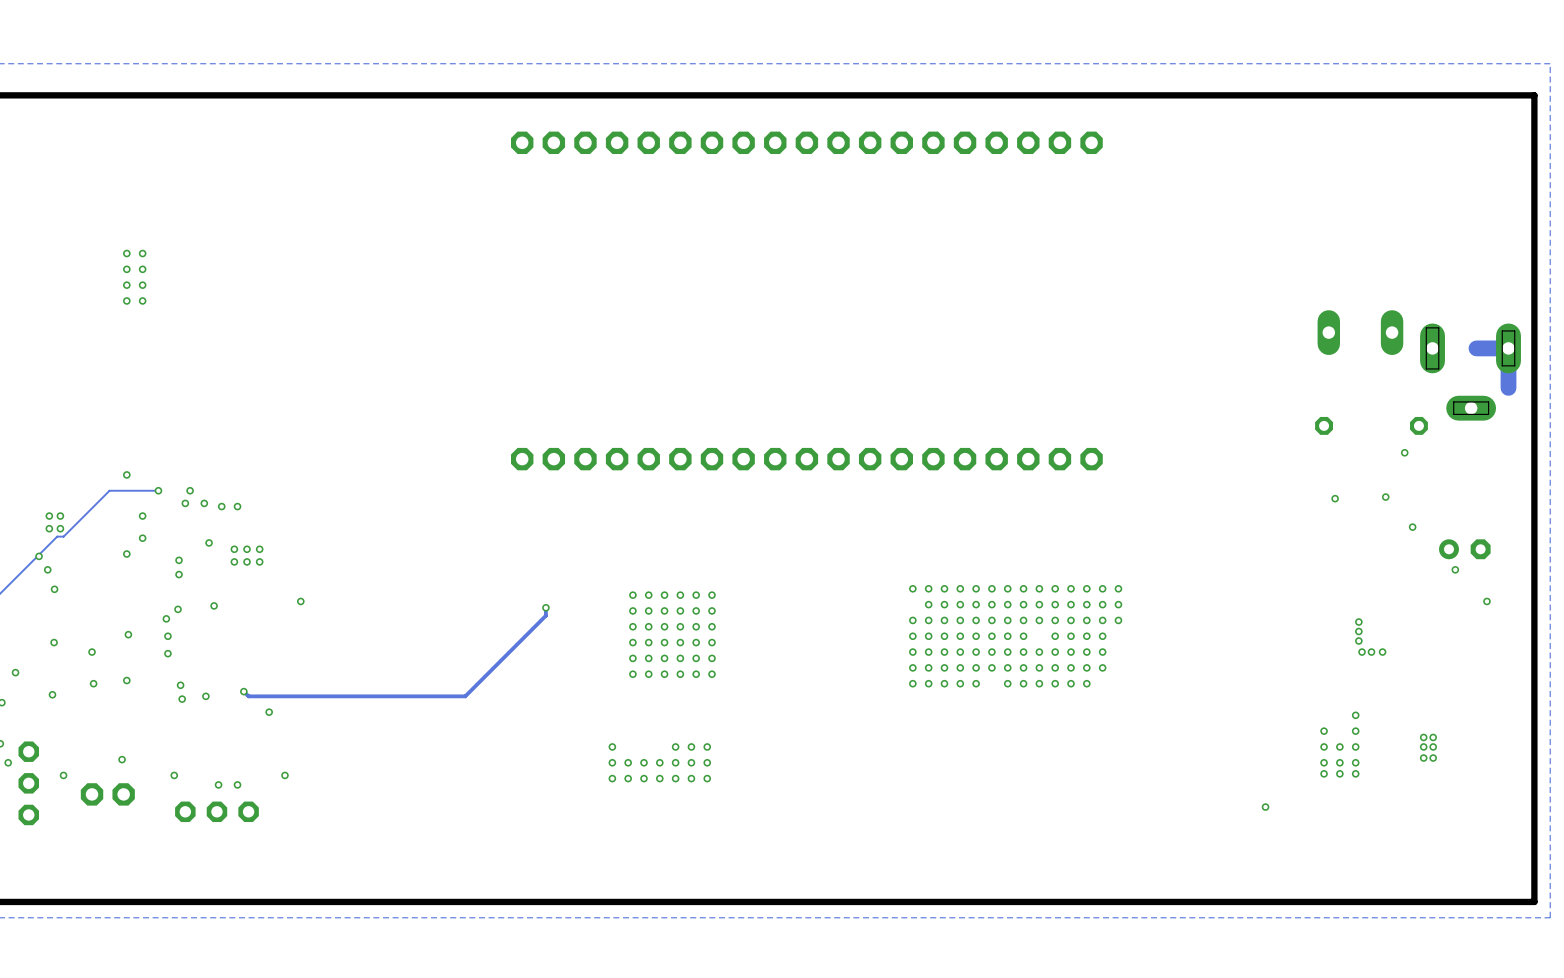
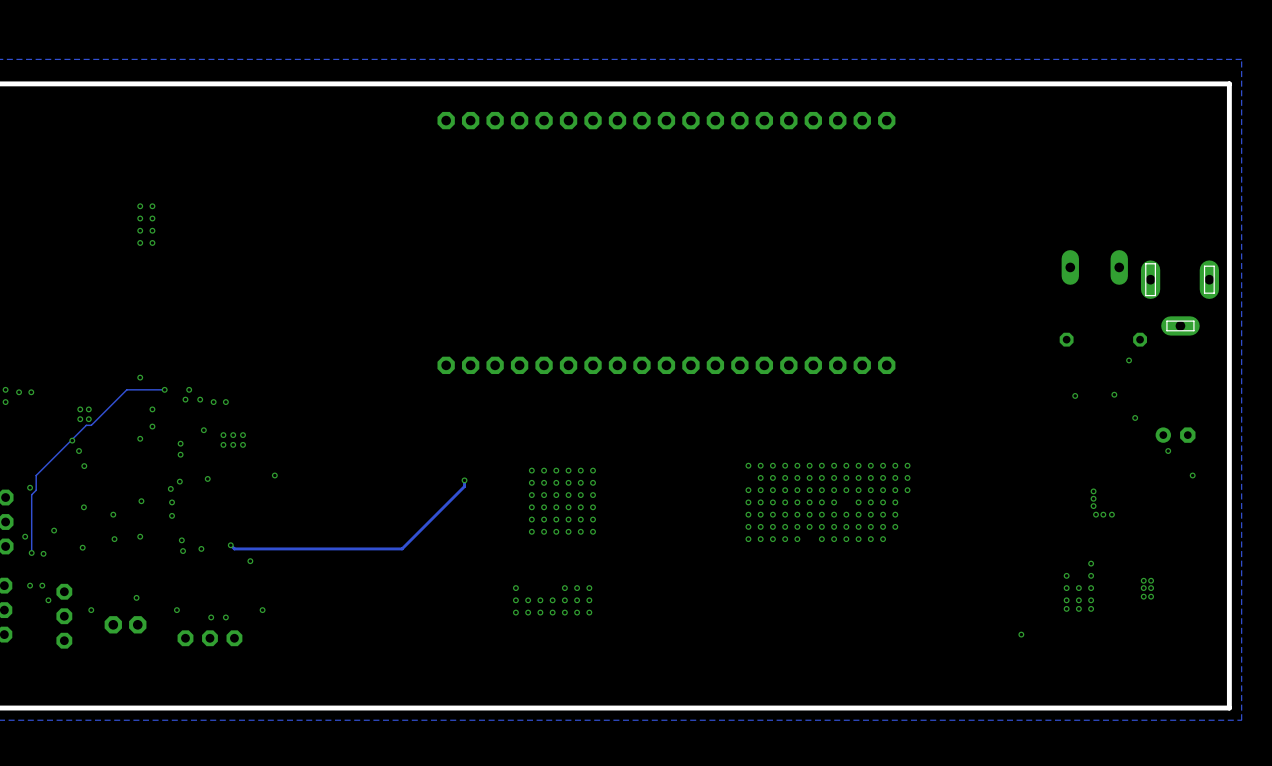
track: (1476, 348) (1508, 348) (1508, 387) -> none

